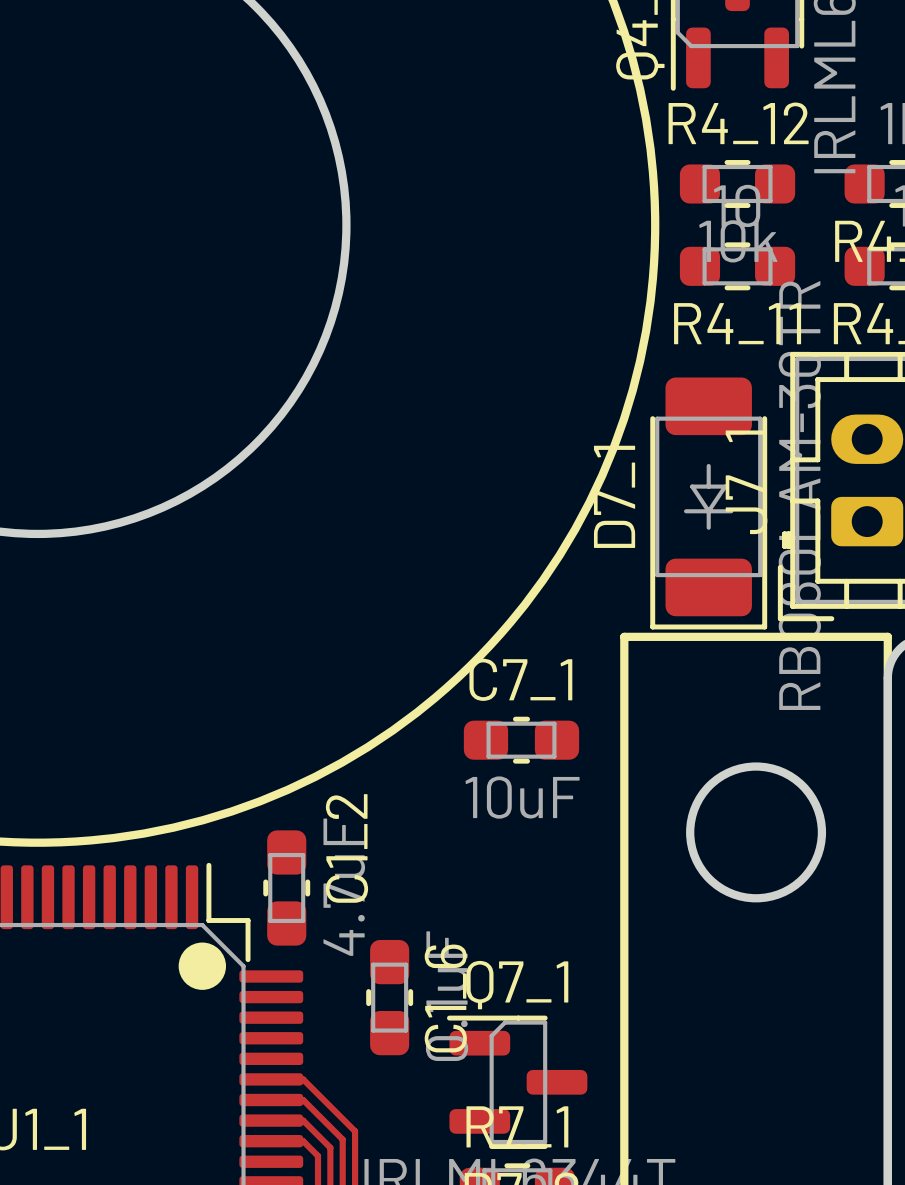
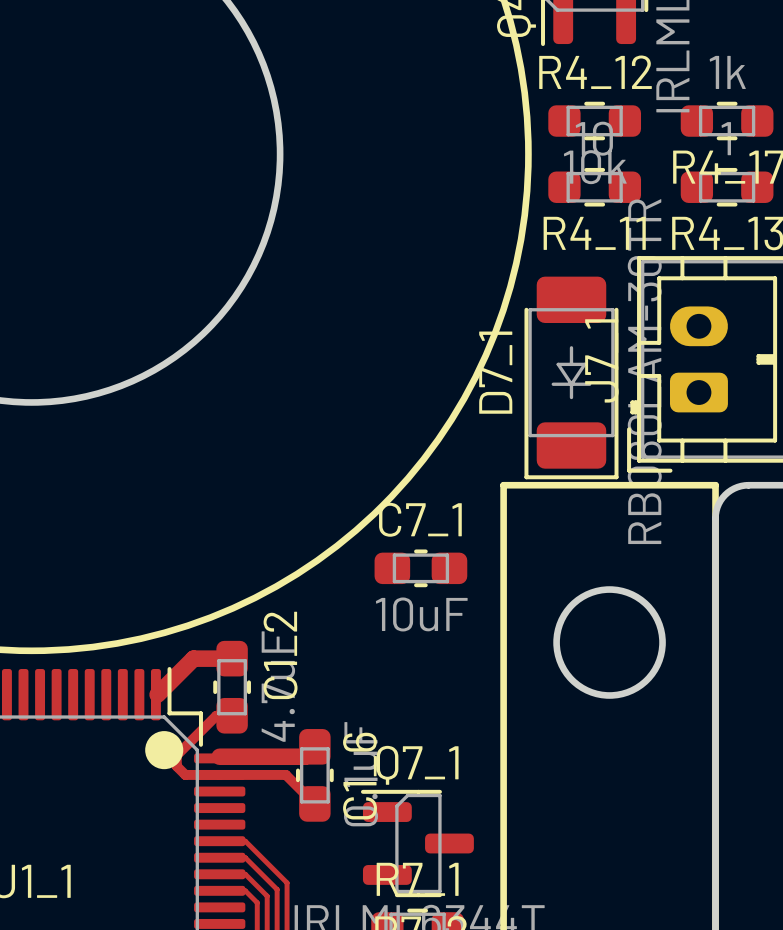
track: none -> (232, 658) (193, 658) (157, 694)
track: none -> (232, 715) (216, 715) (176, 755) (176, 766) (185, 774) (285, 774) (314, 803)
track: none -> (314, 746) (304, 756) (219, 756)

